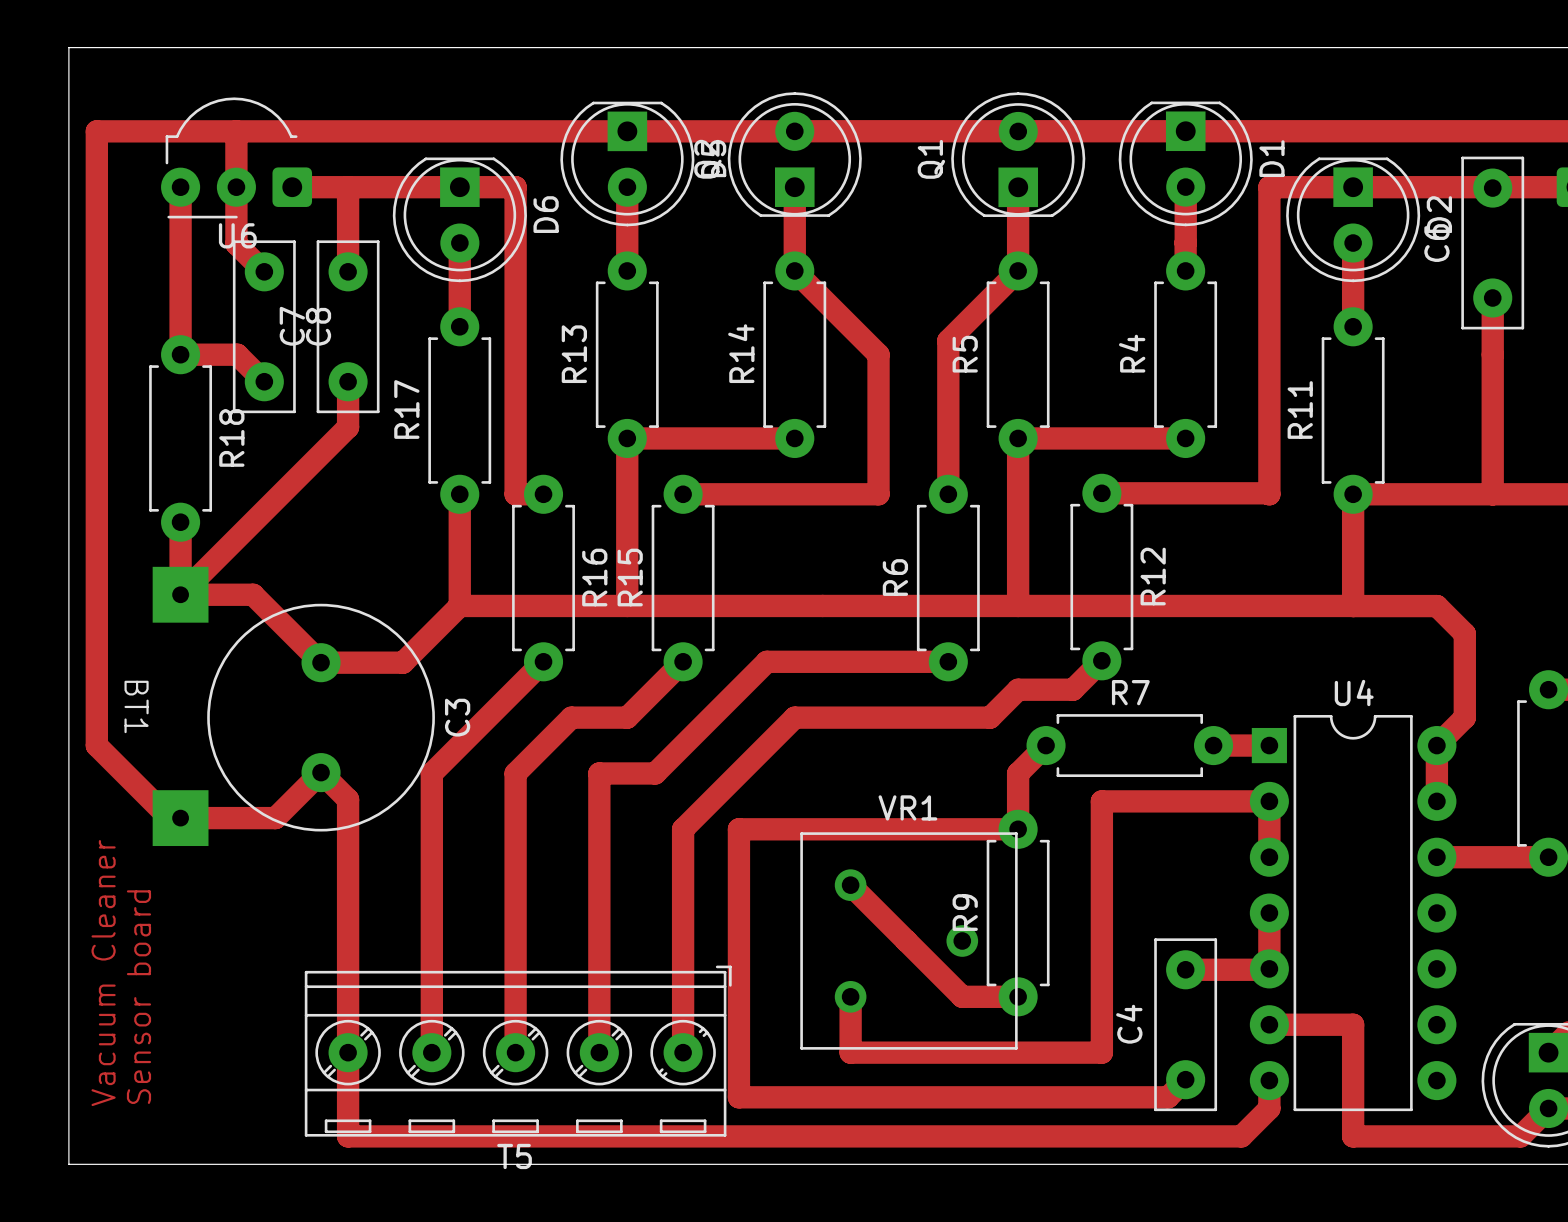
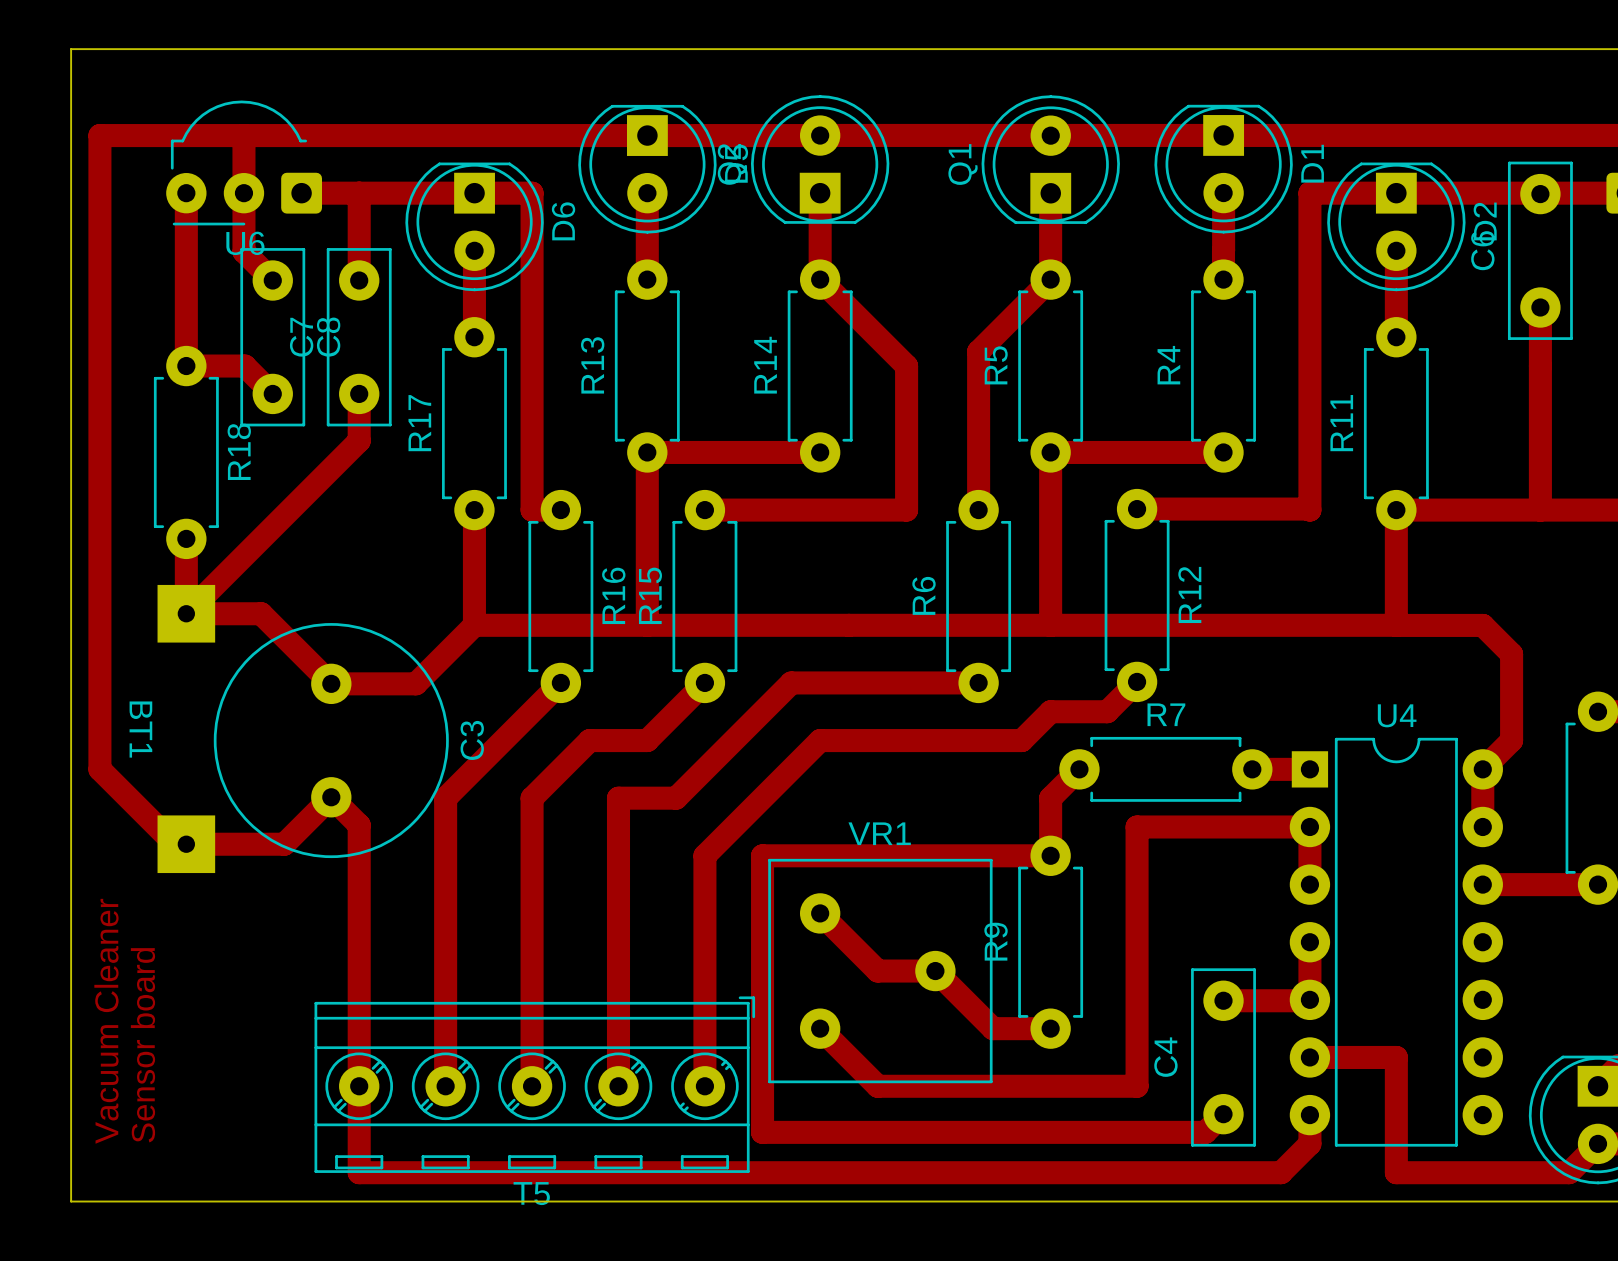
VR1 footprint: [800, 832, 1018, 1050] -> [768, 858, 993, 1084]
track: (850, 885) (906, 940) -> (820, 913) (877, 971) (935, 971)
track: (850, 996) (850, 1052) -> (820, 1028) (877, 1086)

